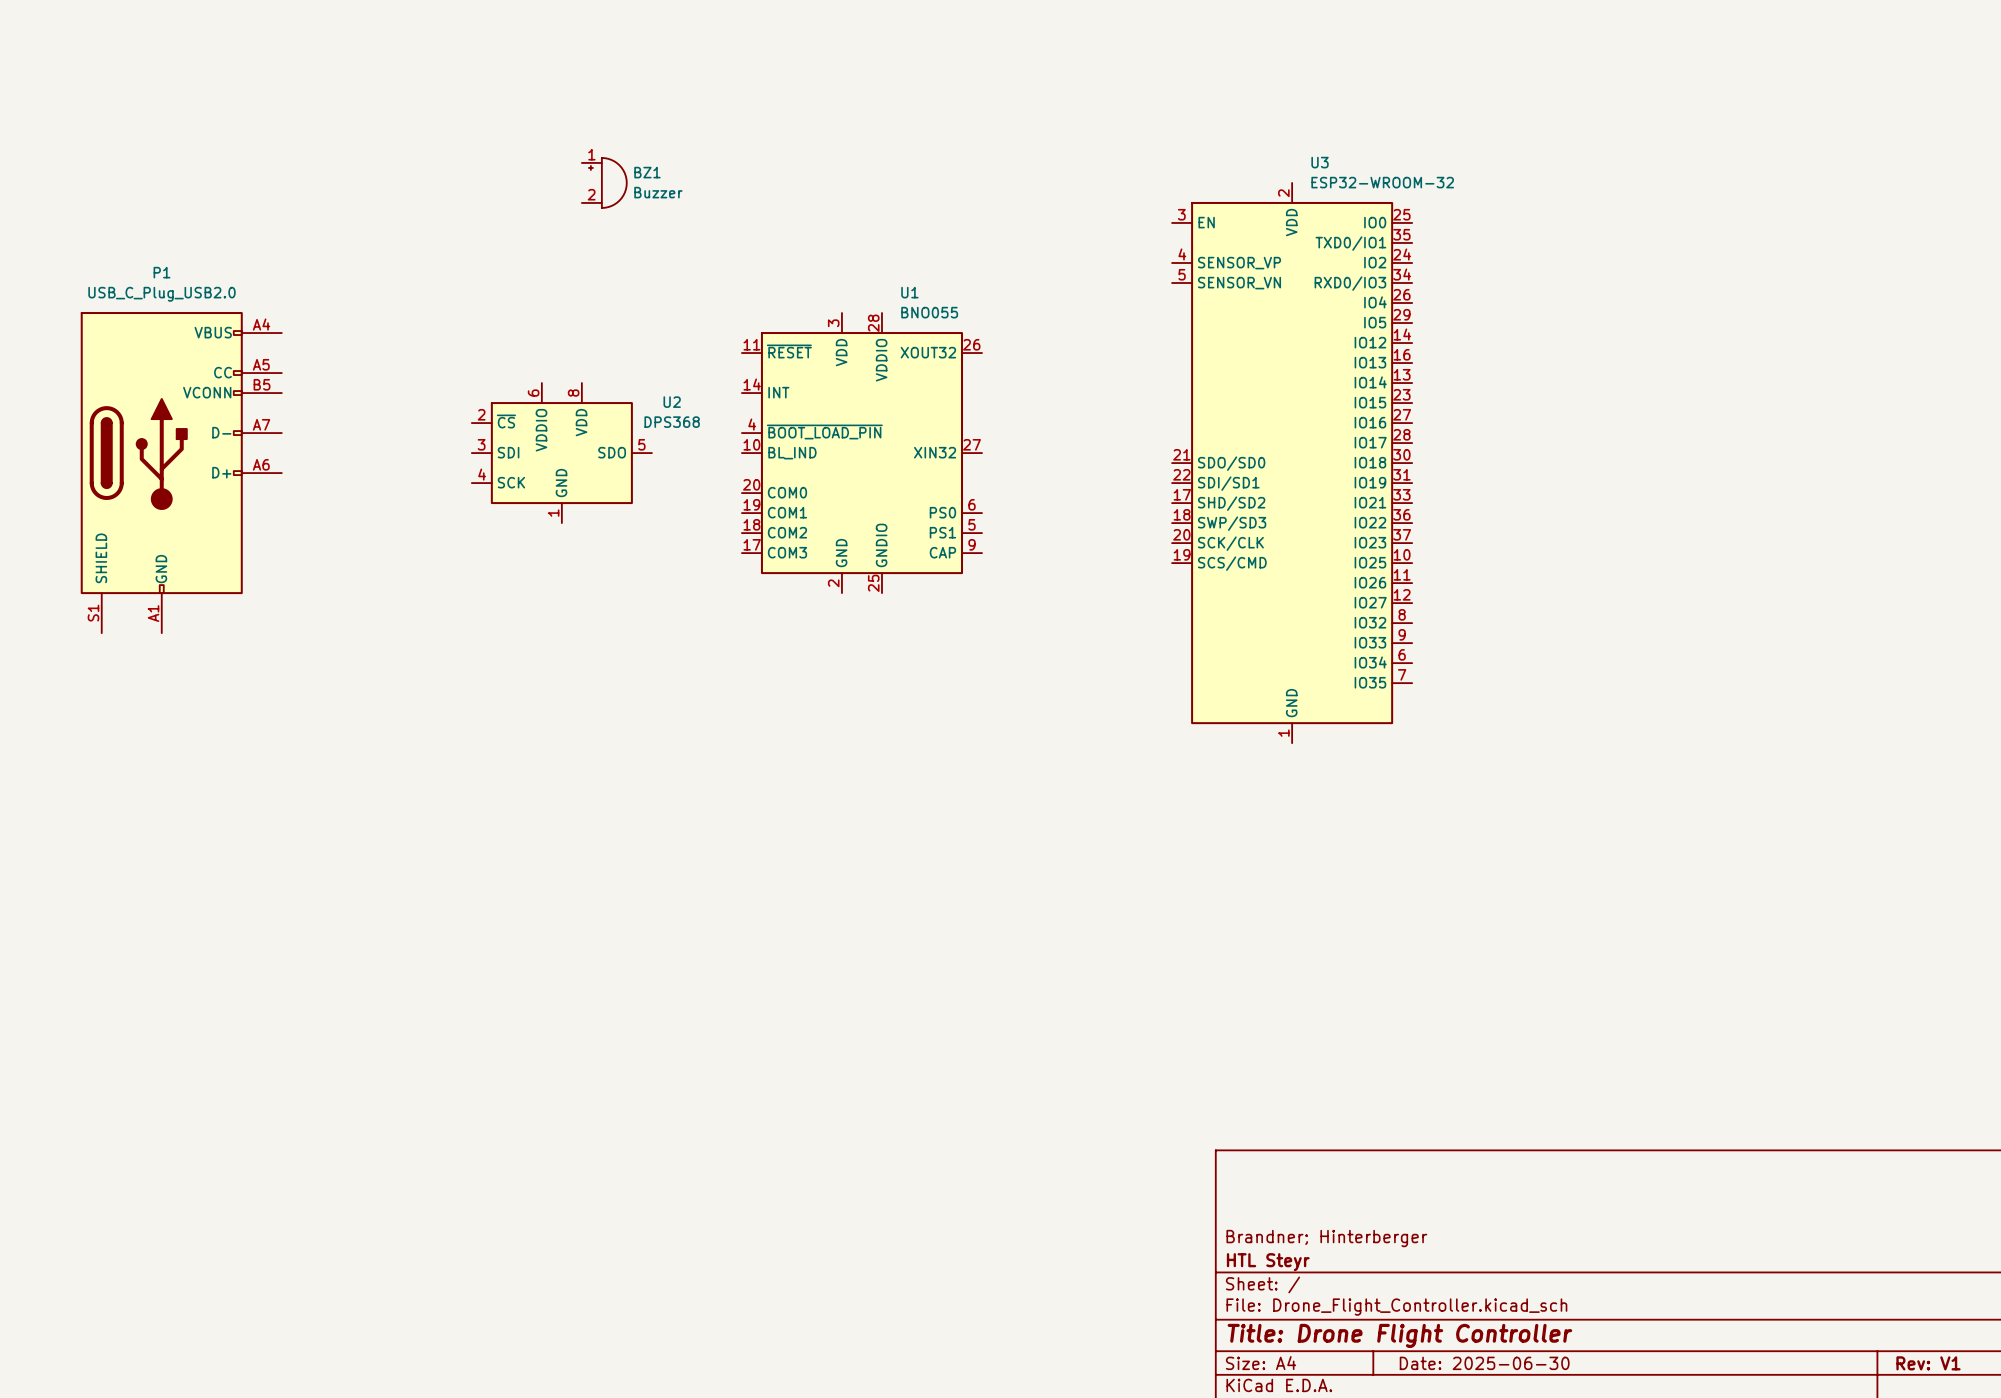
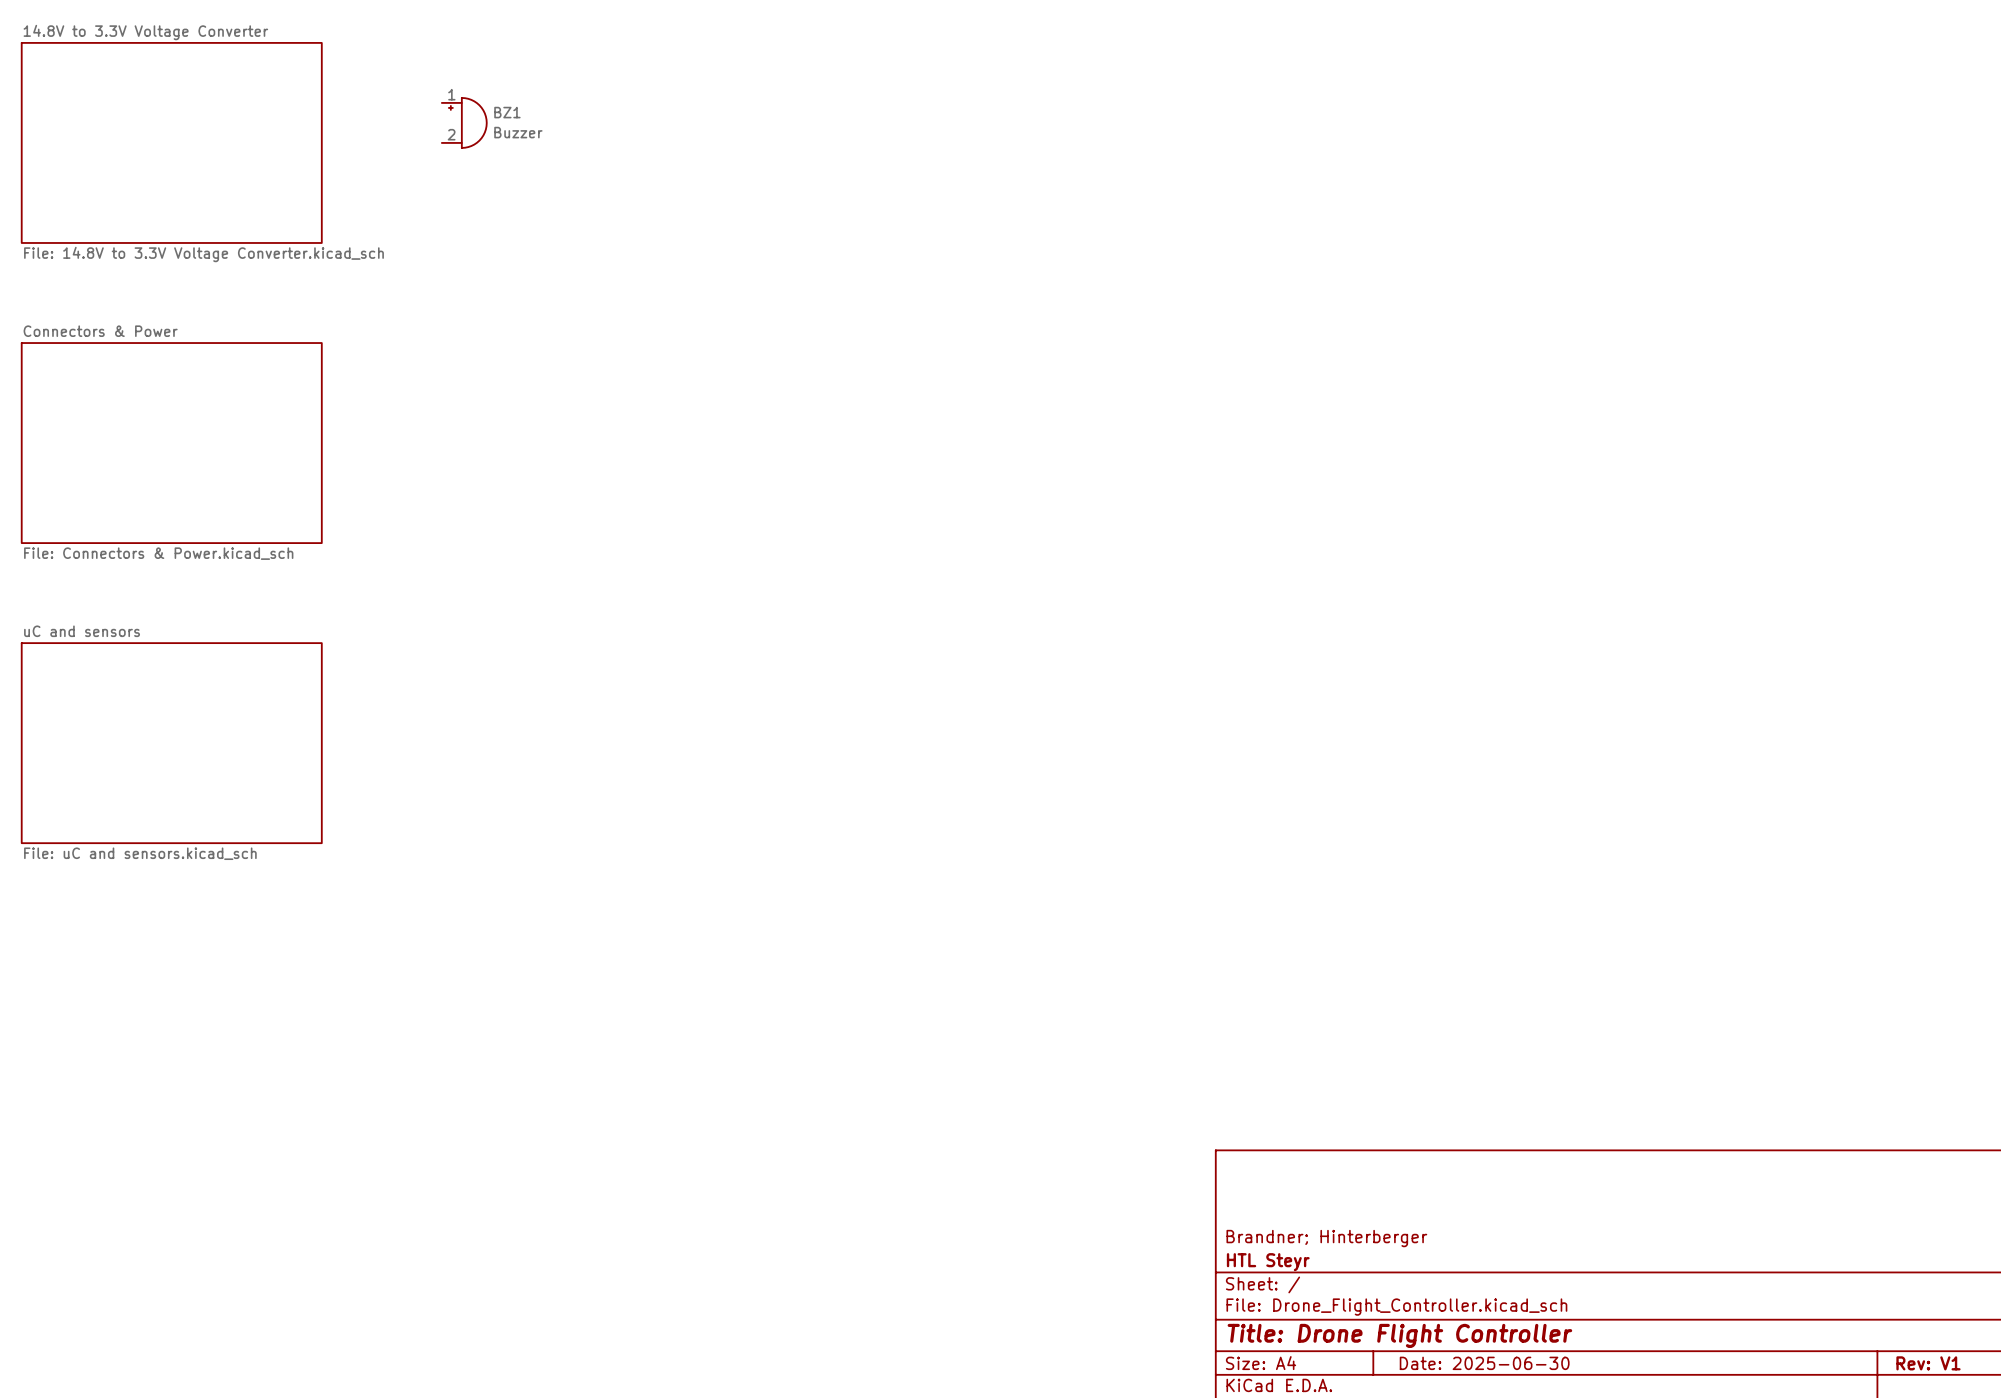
sheet 14.8V to 3.3V Voltage Converter: none -> File: 14.8V to 3.3V Voltage Converter.kicad_sch (171, 142)
BZ1 position: (604, 182) -> (464, 122)
sheet Connectors & Power: none -> File: Connectors & Power.kicad_sch (171, 443)
U2: DPS368 (561, 453) -> none
U1: BNO055 (861, 453) -> none
U3: ESP32-WROOM-32 (1292, 463) -> none
P1: USB_C_Plug_USB2.0 (181, 472) -> none
sheet uC and sensors: none -> File: uC and sensors.kicad_sch (171, 743)

